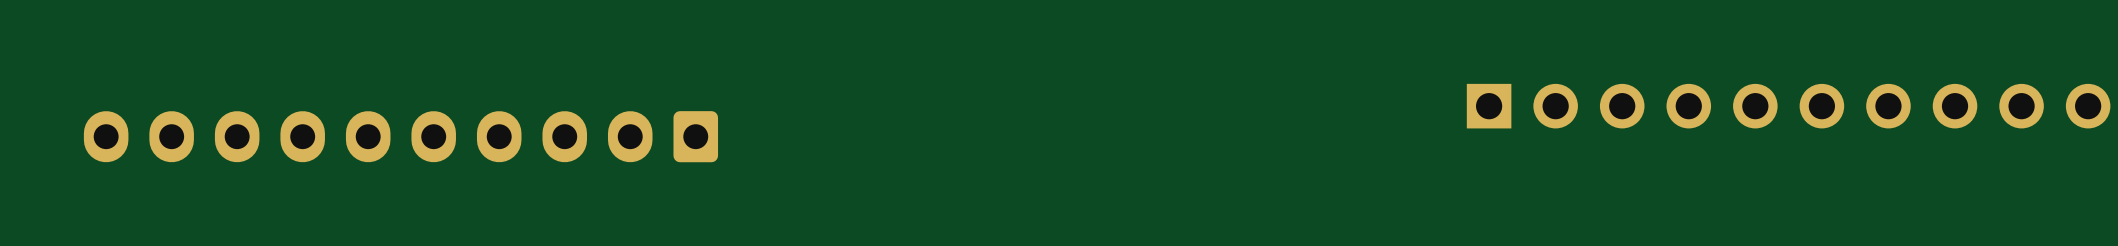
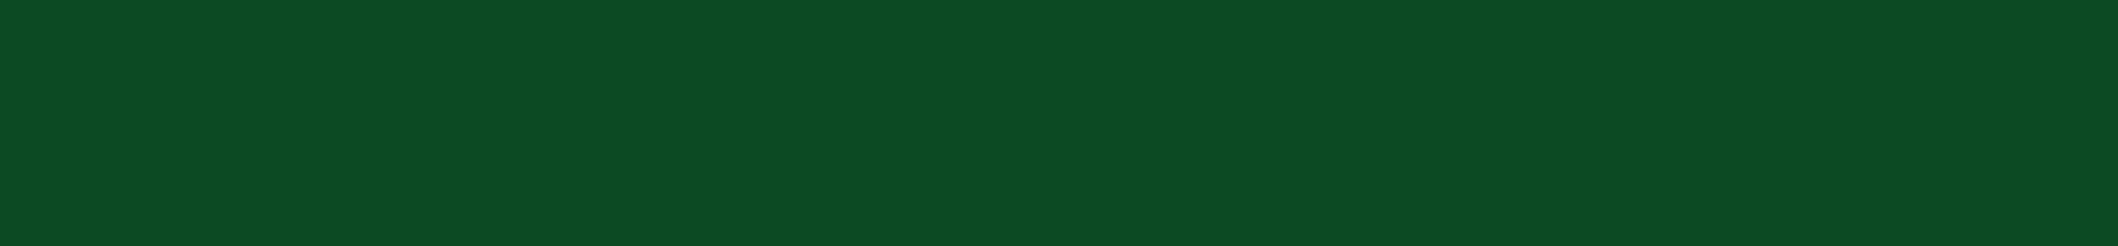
part: (1788, 106) -> none
part: (400, 136) -> none

